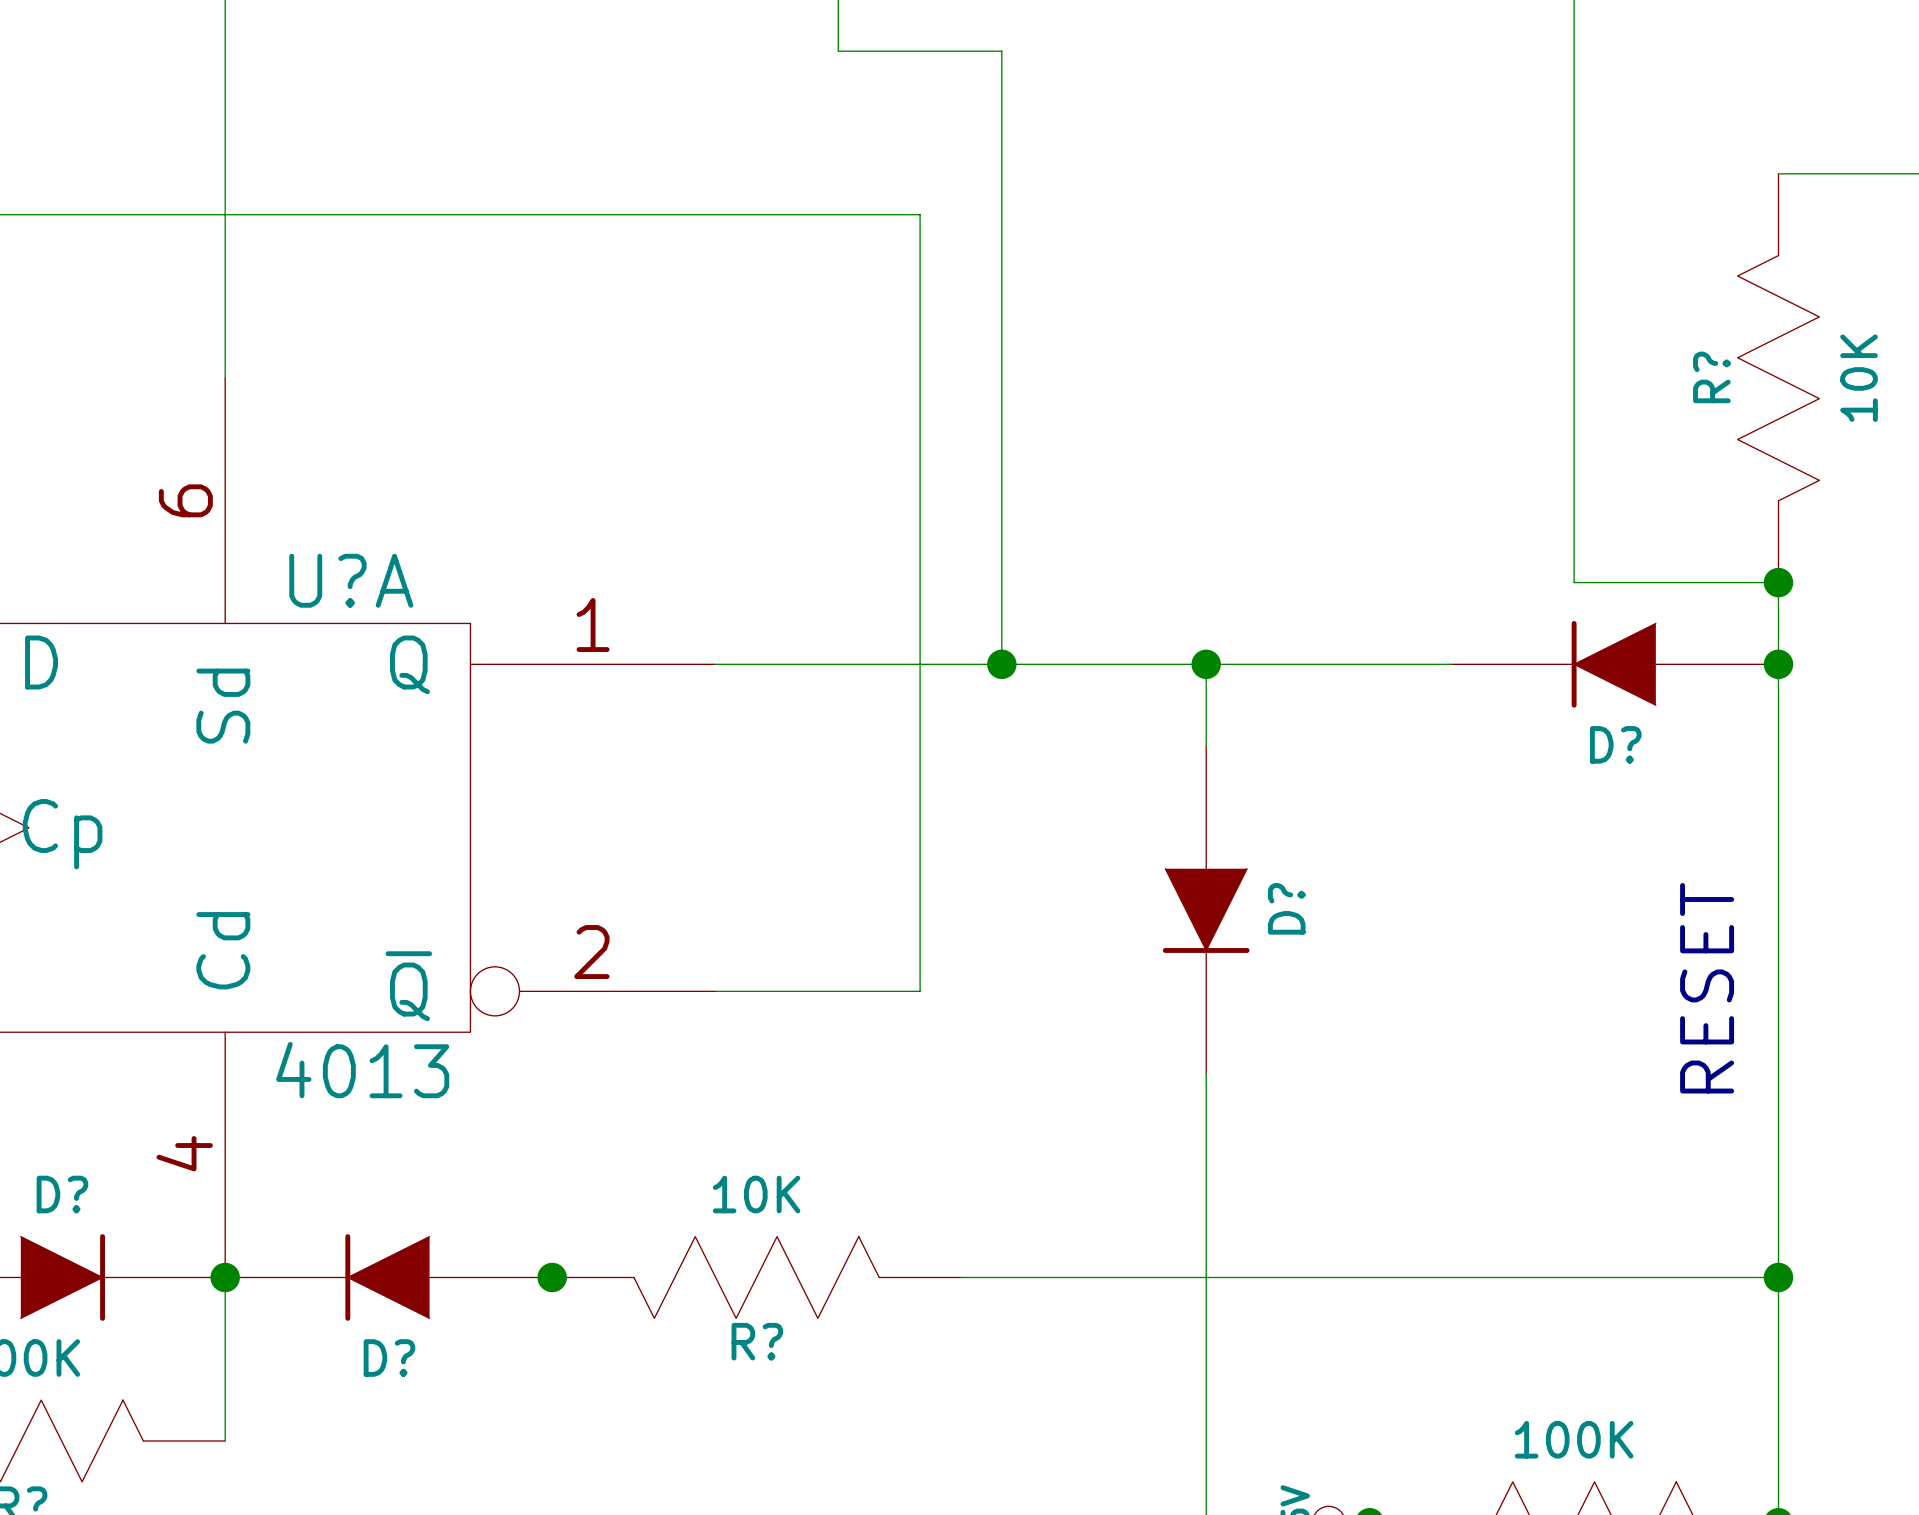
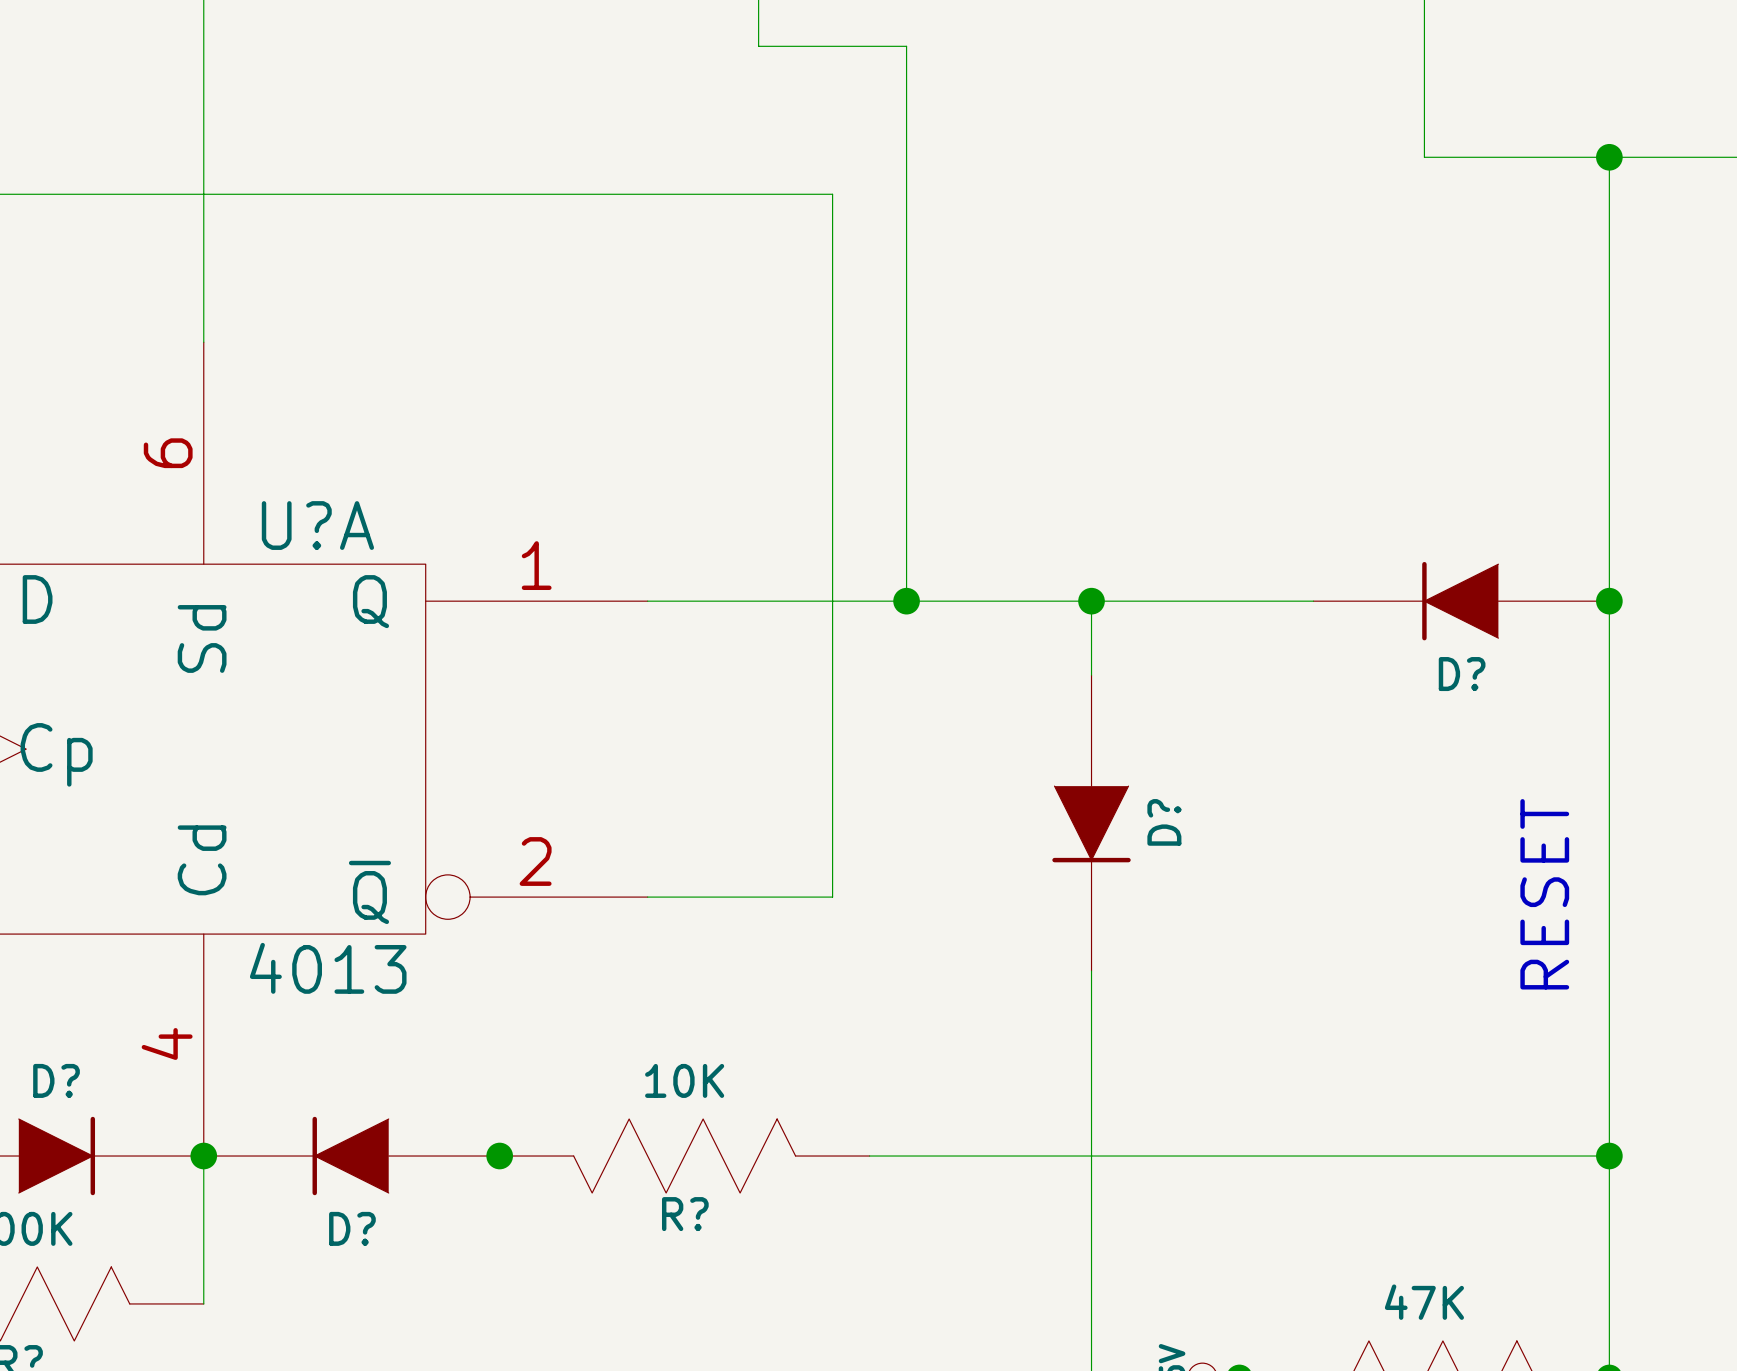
wire: (1574, 173) (1574, 582) (1778, 582) -> (1424, 157) (1609, 157) (1609, 527)
junction: none -> (1609, 157)
R?: 10K (1778, 378) -> none
junction: (1778, 582) -> none
part value: 100K (1574, 1439) -> 47K (1424, 1302)

